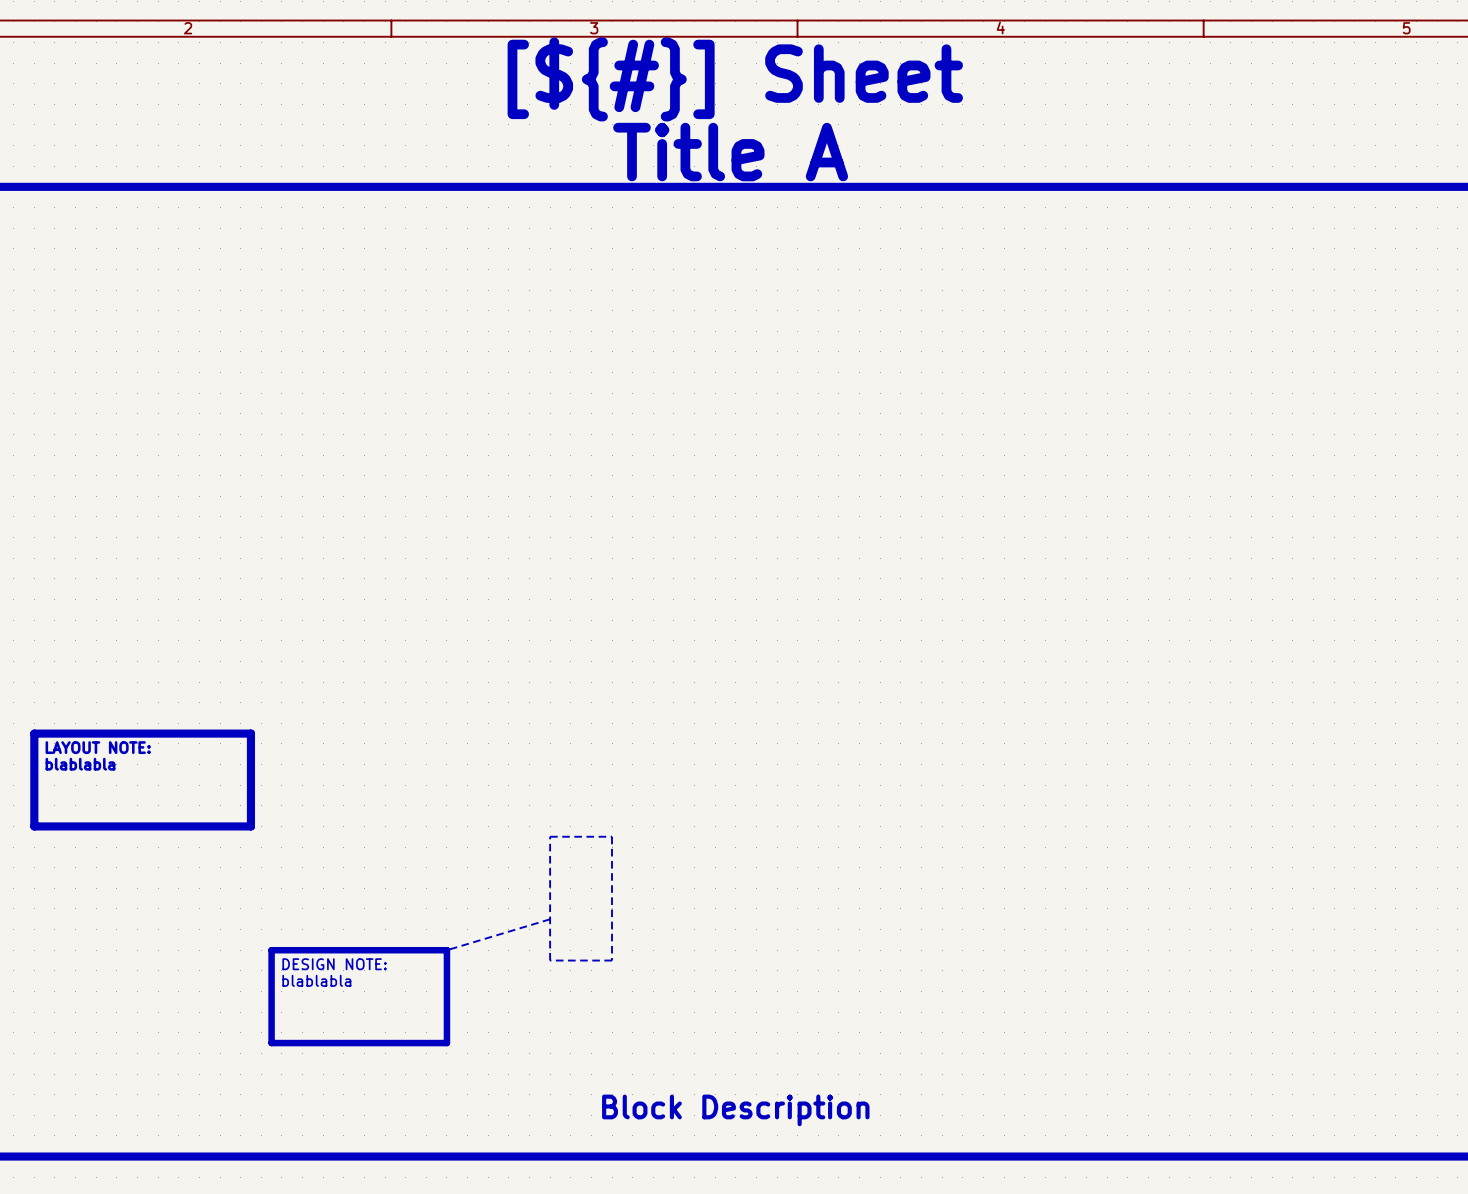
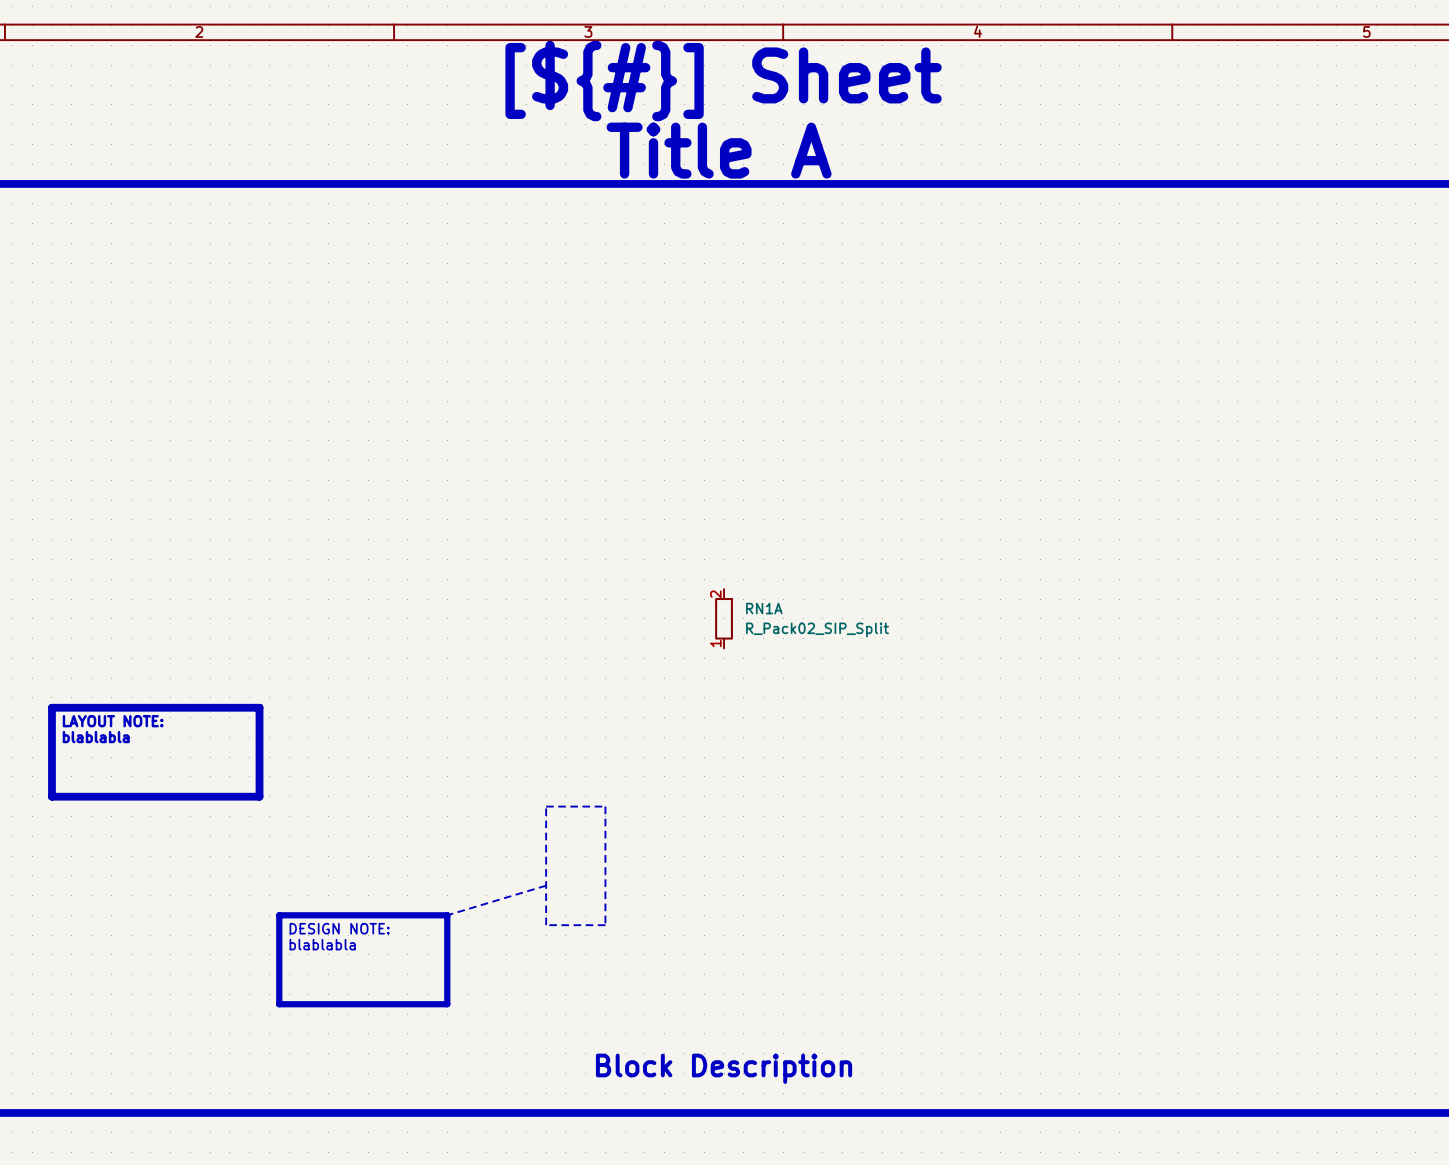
RN1A: none -> R_Pack02_SIP_Split (724, 618)

